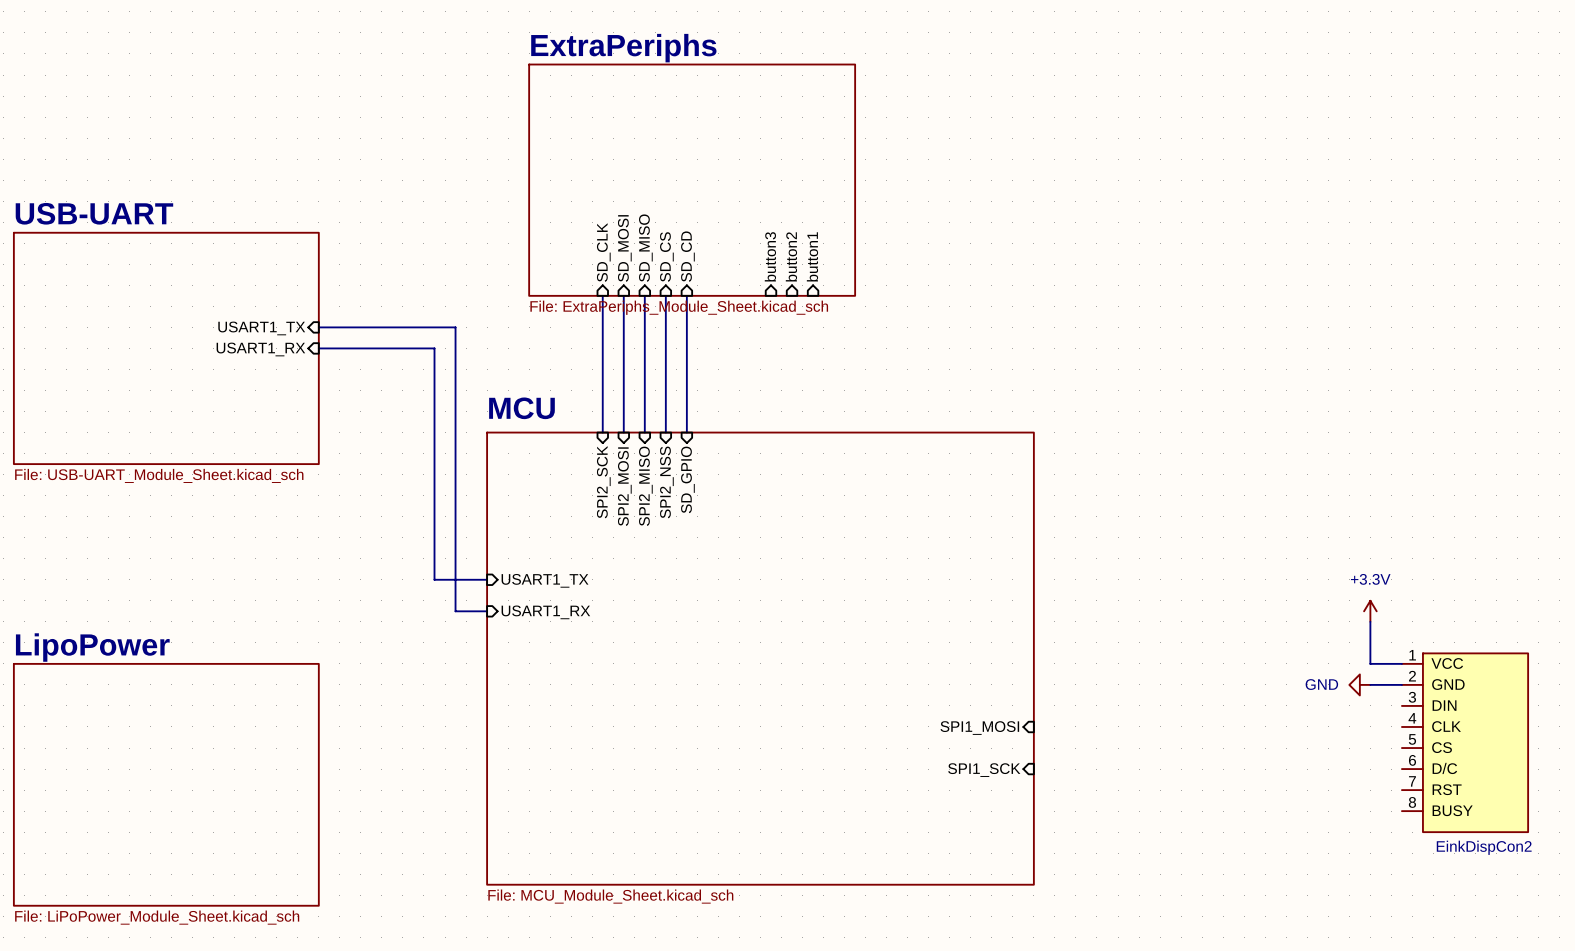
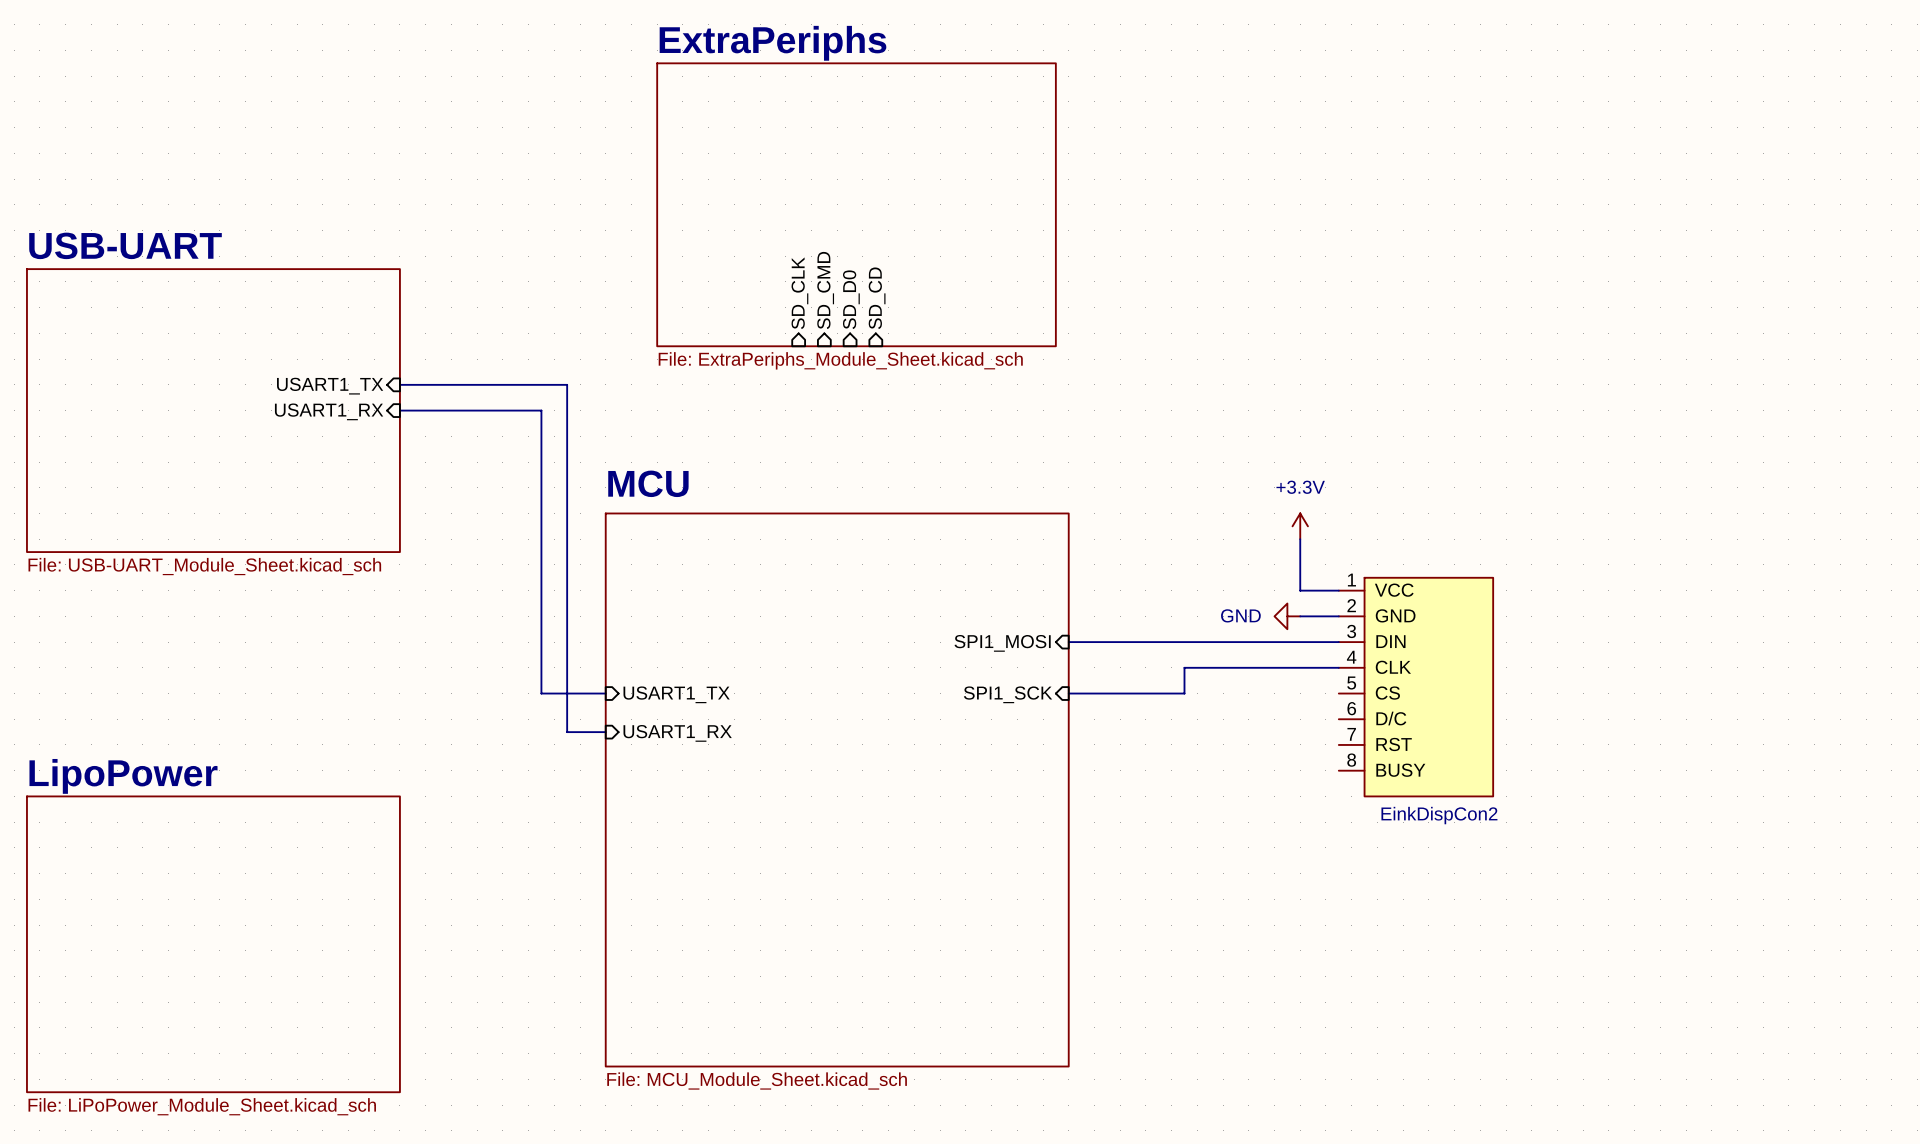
sheet pin: SD_MOSI (624, 248) -> none
sheet pin: SD_MISO (645, 248) -> SD_CLK (799, 293)
sheet pin: SD_CLK (603, 252) -> none
sheet pin: SD_CD (687, 256) -> SD_D0 (851, 299)
sheet pin: none -> SD_CD (877, 298)
sheet pin: button3 (770, 256) -> none
sheet pin: button2 (791, 256) -> none
sheet pin: button1 (812, 256) -> none
sheet pin: SD_CS (666, 257) -> SD_CMD (825, 290)
wire: (602, 295) (602, 432) -> none
wire: (623, 295) (623, 432) -> none
wire: (644, 295) (644, 432) -> none
wire: (665, 295) (665, 432) -> none
wire: (686, 295) (686, 432) -> none
power symbol: none -> +3.3V (1300, 526)
wire: none -> (1300, 539) (1300, 590) (1338, 590)
sheet pin: SD_GPIO (687, 479) -> none
sheet pin: SPI2_SCK (603, 482) -> none
sheet pin: SPI2_NSS (666, 482) -> none
sheet pin: SPI2_MOSI (624, 486) -> none
sheet pin: SPI2_MISO (645, 486) -> none
power symbol: none -> GND (1287, 616)
wire: none -> (1300, 616) (1338, 616)
wire: none -> (1068, 642) (1338, 642)
sheet pin: none -> SPI1_MOSI (1002, 643)
wire: none -> (1338, 667) (1184, 667) (1184, 693) (1068, 693)
sheet pin: none -> SPI1_SCK (1008, 694)
power symbol: +3.3V (1370, 611) -> none
wire: (1370, 621) (1370, 663) (1401, 663) -> none
sheet MCU: none -> File: MCU_Module_Sheet.kicad_sch (837, 789)
sheet MCU: File: MCU_Module_Sheet.kicad_sch (760, 658) -> none
power symbol: GND (1359, 684) -> none
wire: (1370, 684) (1401, 684) -> none
sheet pin: SPI1_MOSI (979, 728) -> none
EinkDispCon2 position: (1465, 742) -> (1415, 687)
sheet pin: SPI1_SCK (984, 770) -> none

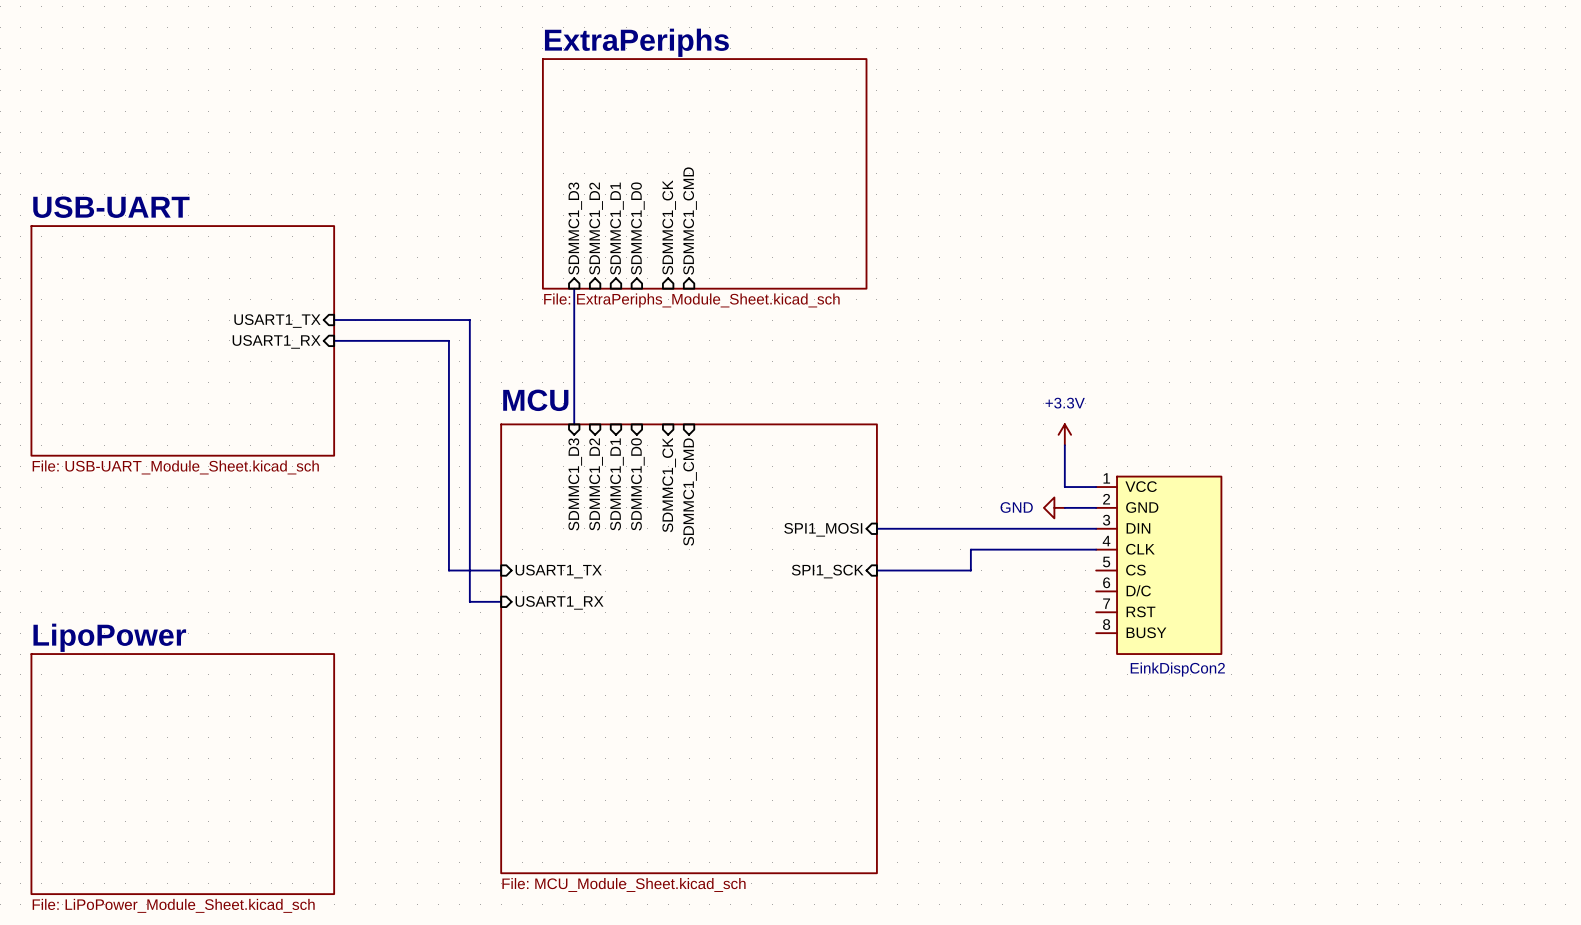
sheet pin: none -> SDMMC1_D3 (575, 228)
sheet pin: none -> SDMMC1_D2 (596, 228)
sheet pin: none -> SDMMC1_D1 (617, 228)
sheet pin: none -> SDMMC1_D0 (637, 228)
sheet pin: SD_CMD (825, 290) -> SDMMC1_CMD (690, 221)
sheet pin: SD_CLK (799, 293) -> SDMMC1_CK (669, 227)
sheet pin: SD_CD (877, 298) -> none
sheet pin: SD_D0 (851, 299) -> none
wire: none -> (574, 288) (574, 424)
sheet pin: none -> SDMMC1_D3 (575, 484)
sheet pin: none -> SDMMC1_D2 (596, 484)
sheet pin: none -> SDMMC1_D1 (617, 484)
sheet pin: none -> SDMMC1_D0 (637, 484)
sheet pin: none -> SDMMC1_CK (669, 485)
sheet pin: none -> SDMMC1_CMD (690, 492)

